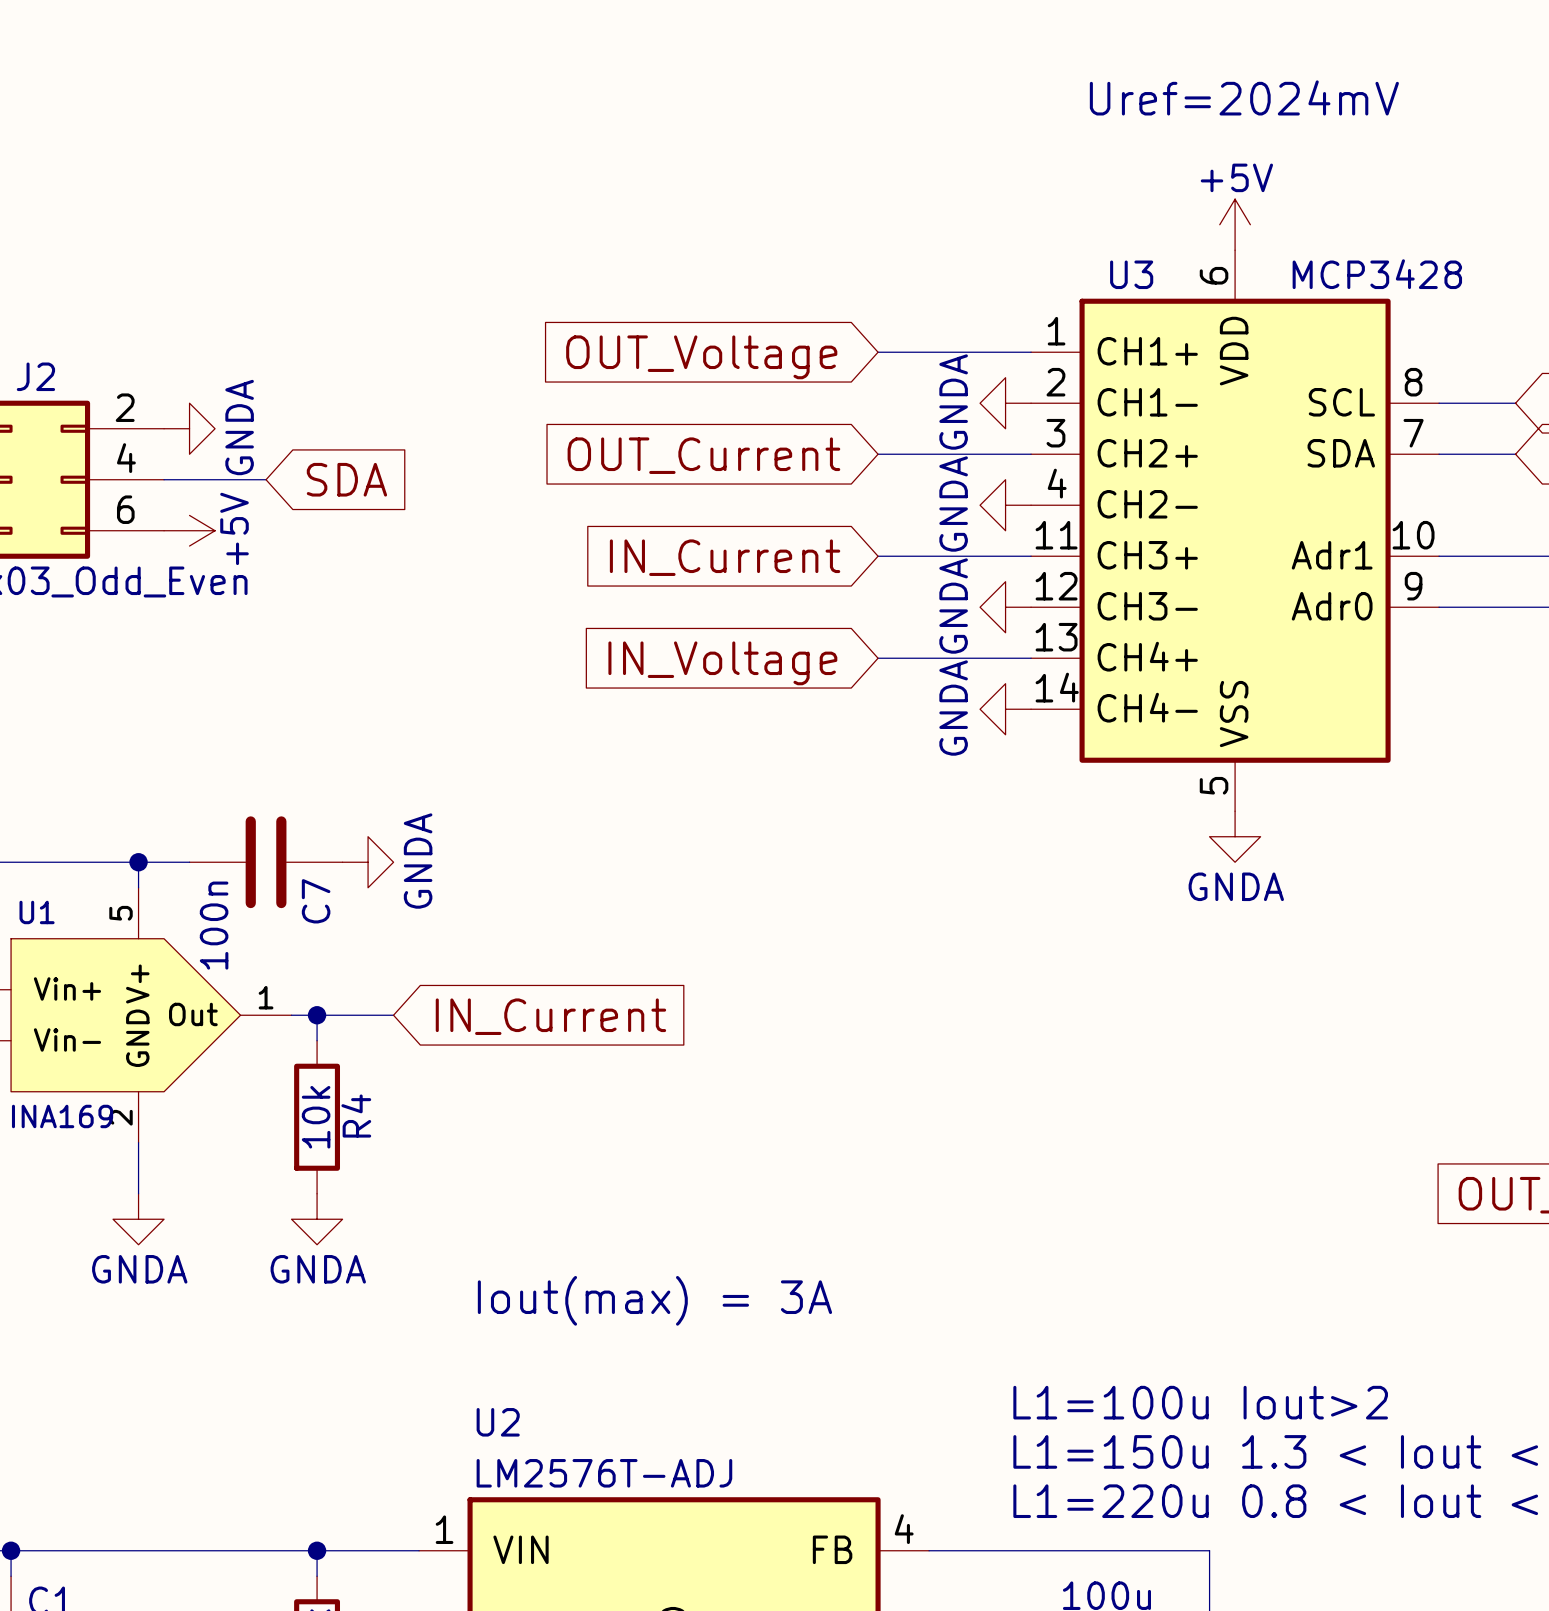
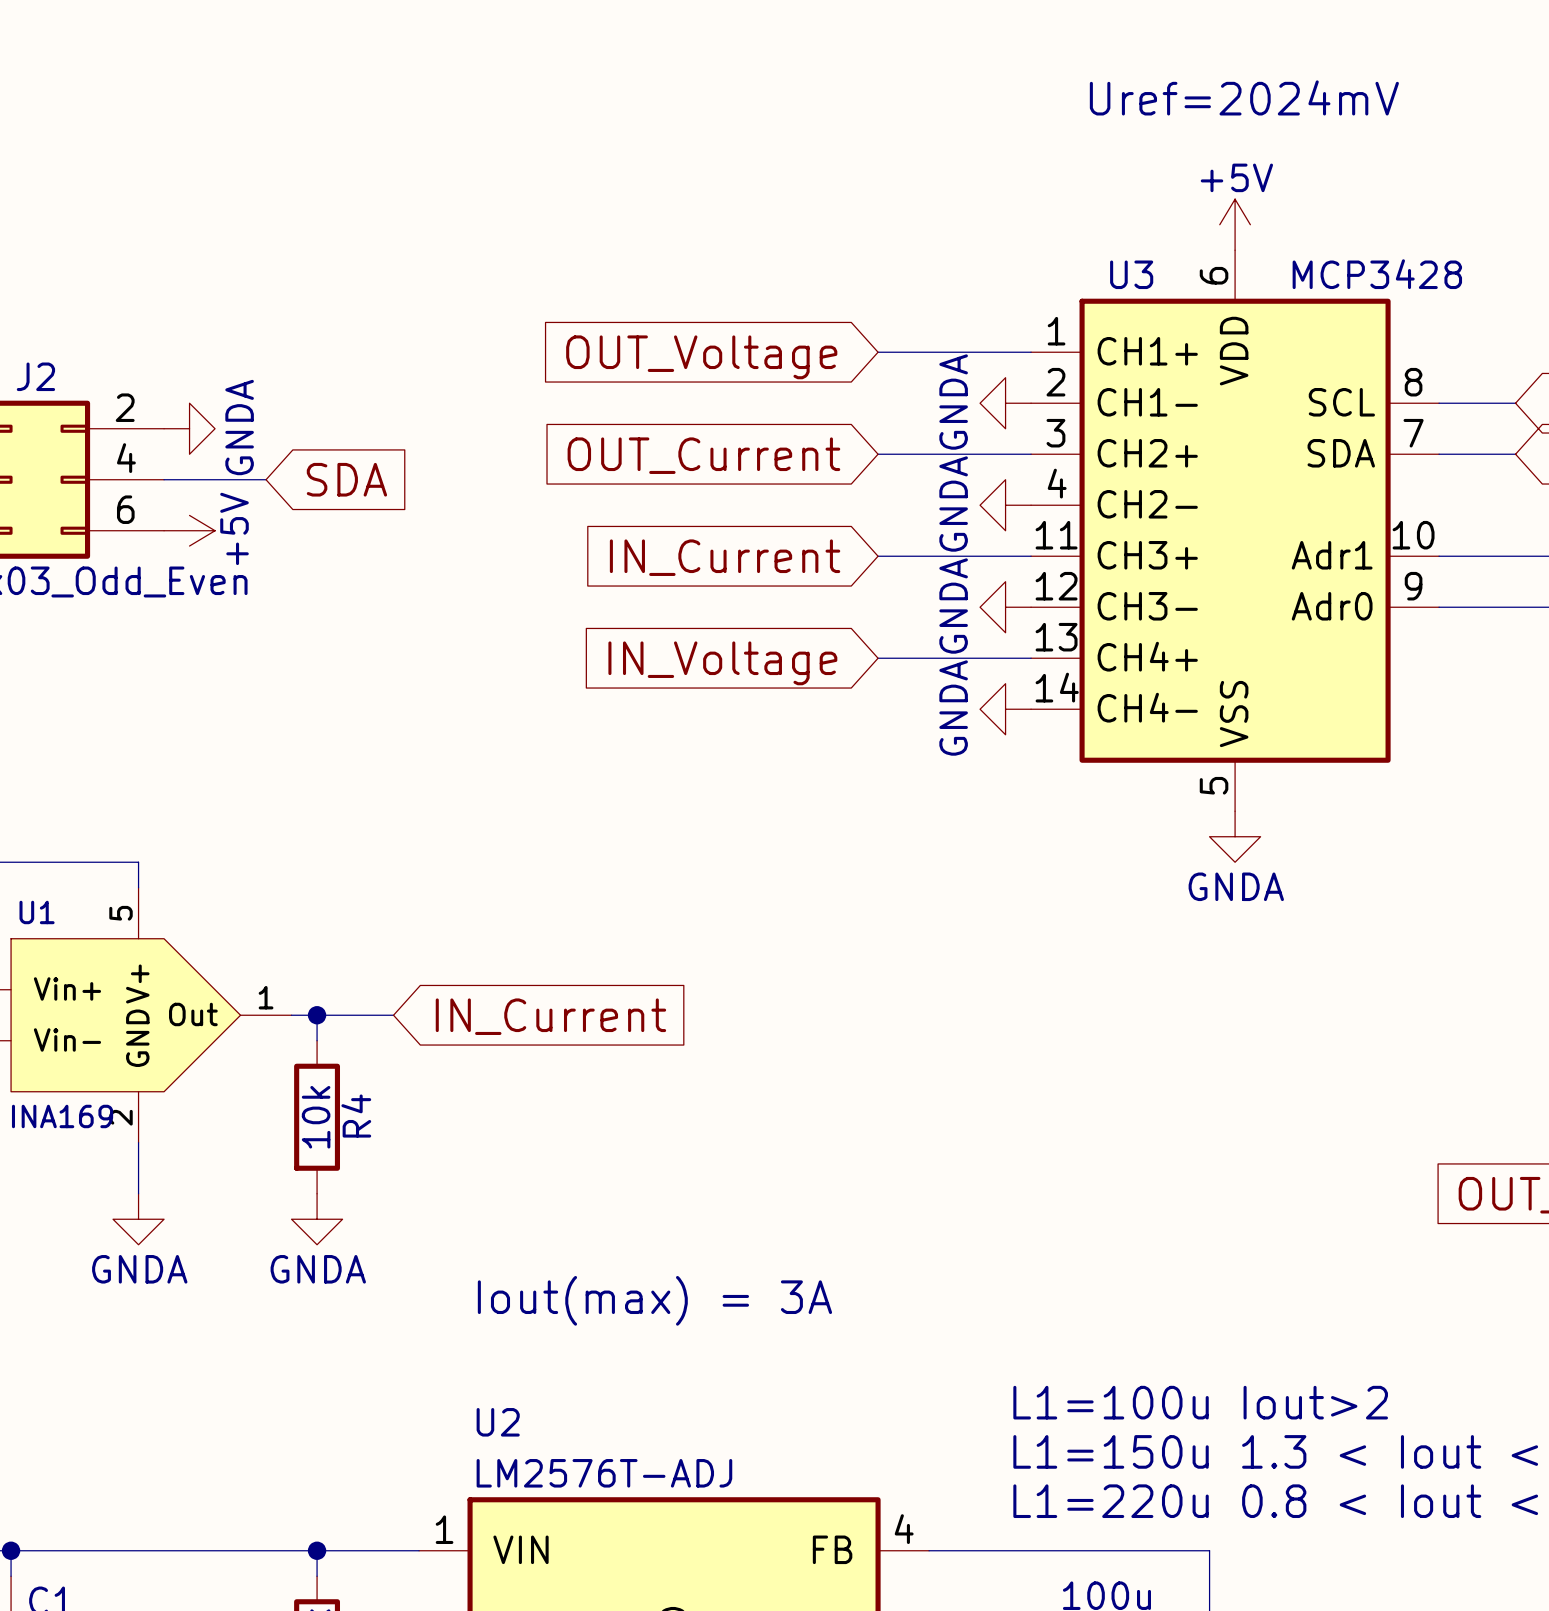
wire: (138, 862) (189, 862) -> none
junction: (138, 862) -> none
C7: 100n (266, 862) -> none
power symbol: GNDA (368, 862) -> none

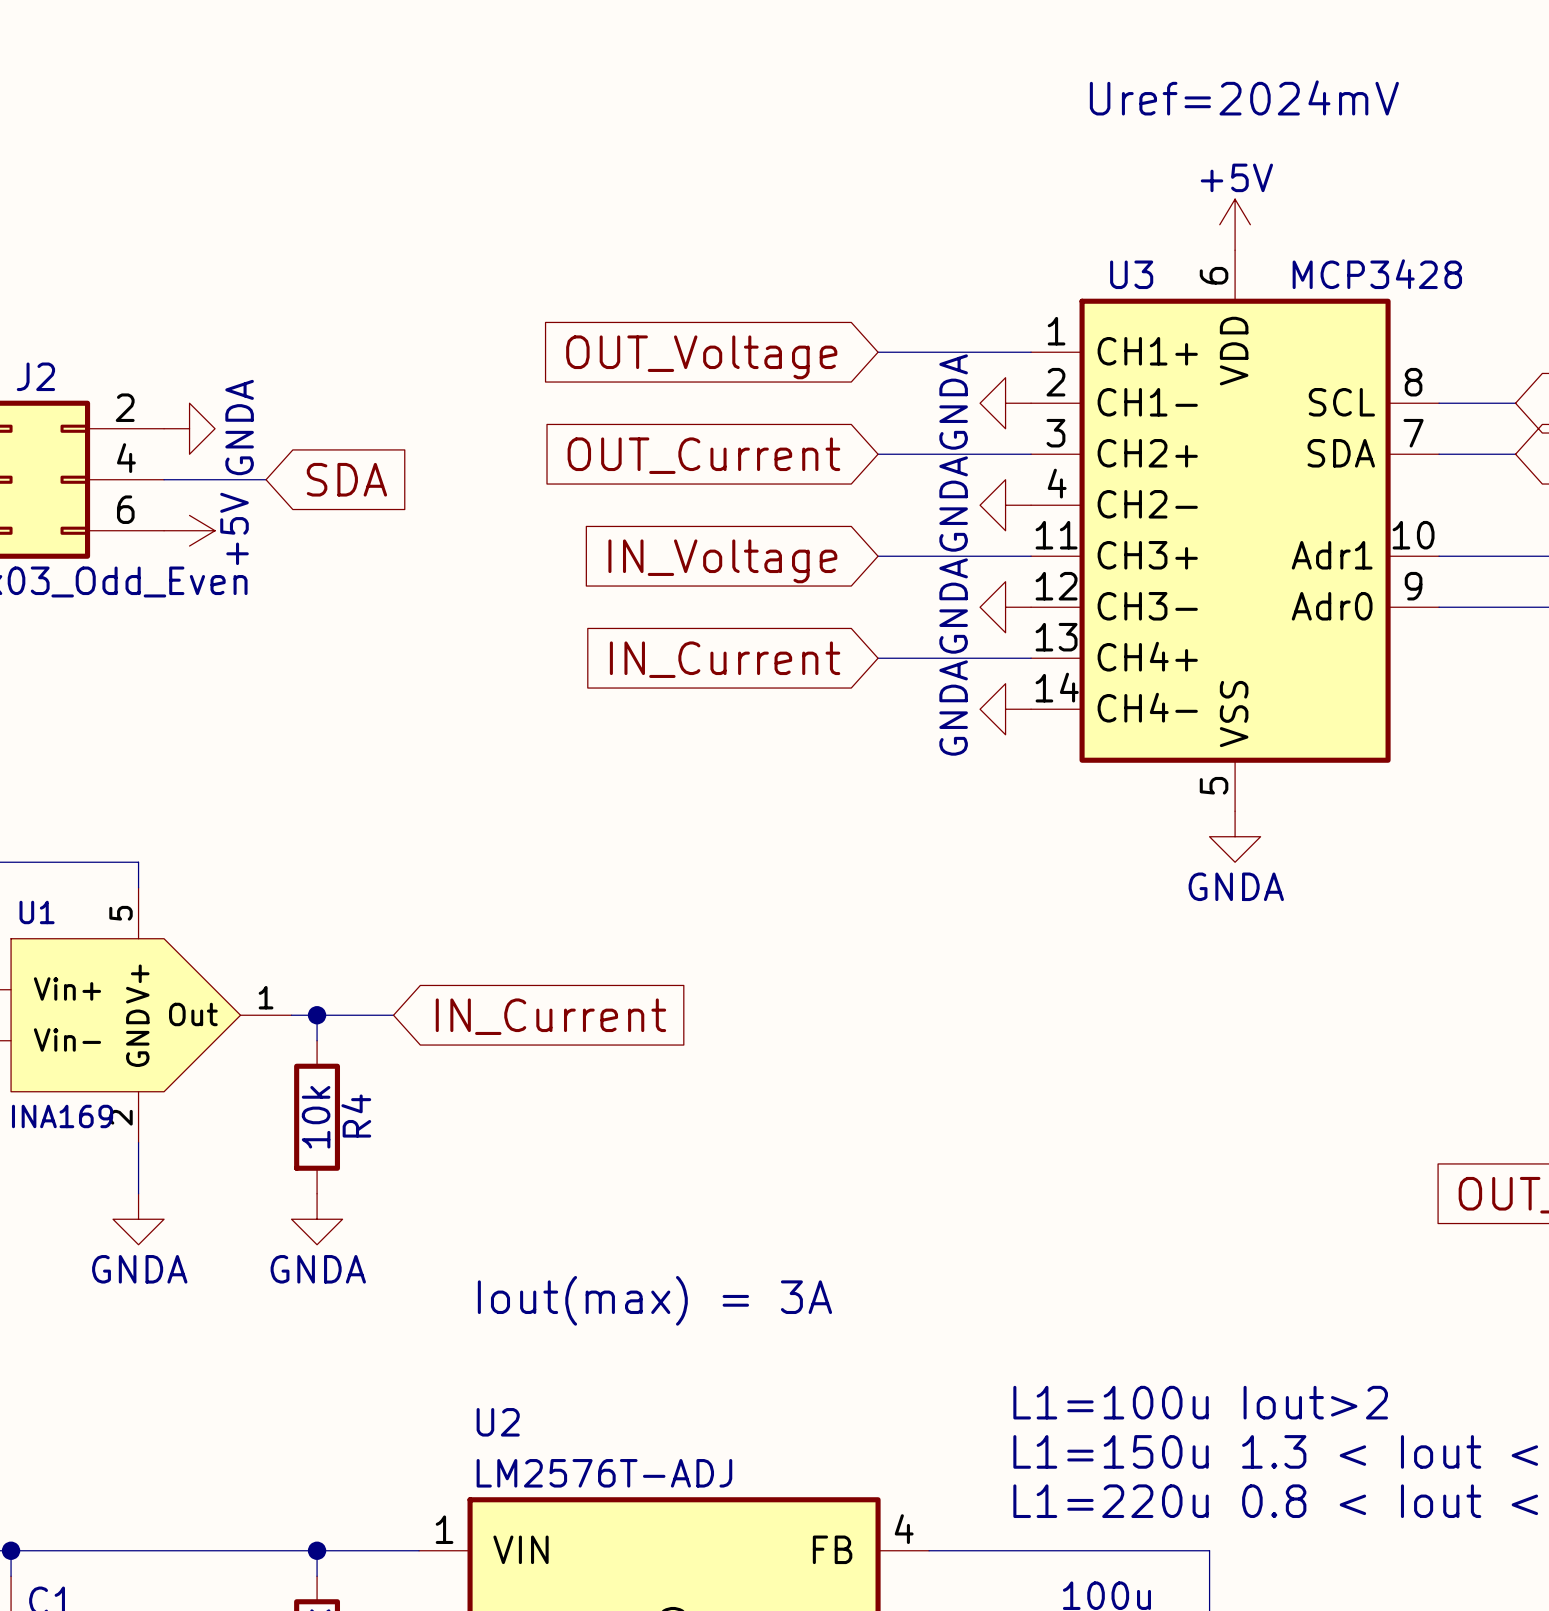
global label: IN_Current (725, 557) -> IN_Voltage (722, 561)
global label: IN_Voltage (722, 663) -> IN_Current (725, 659)

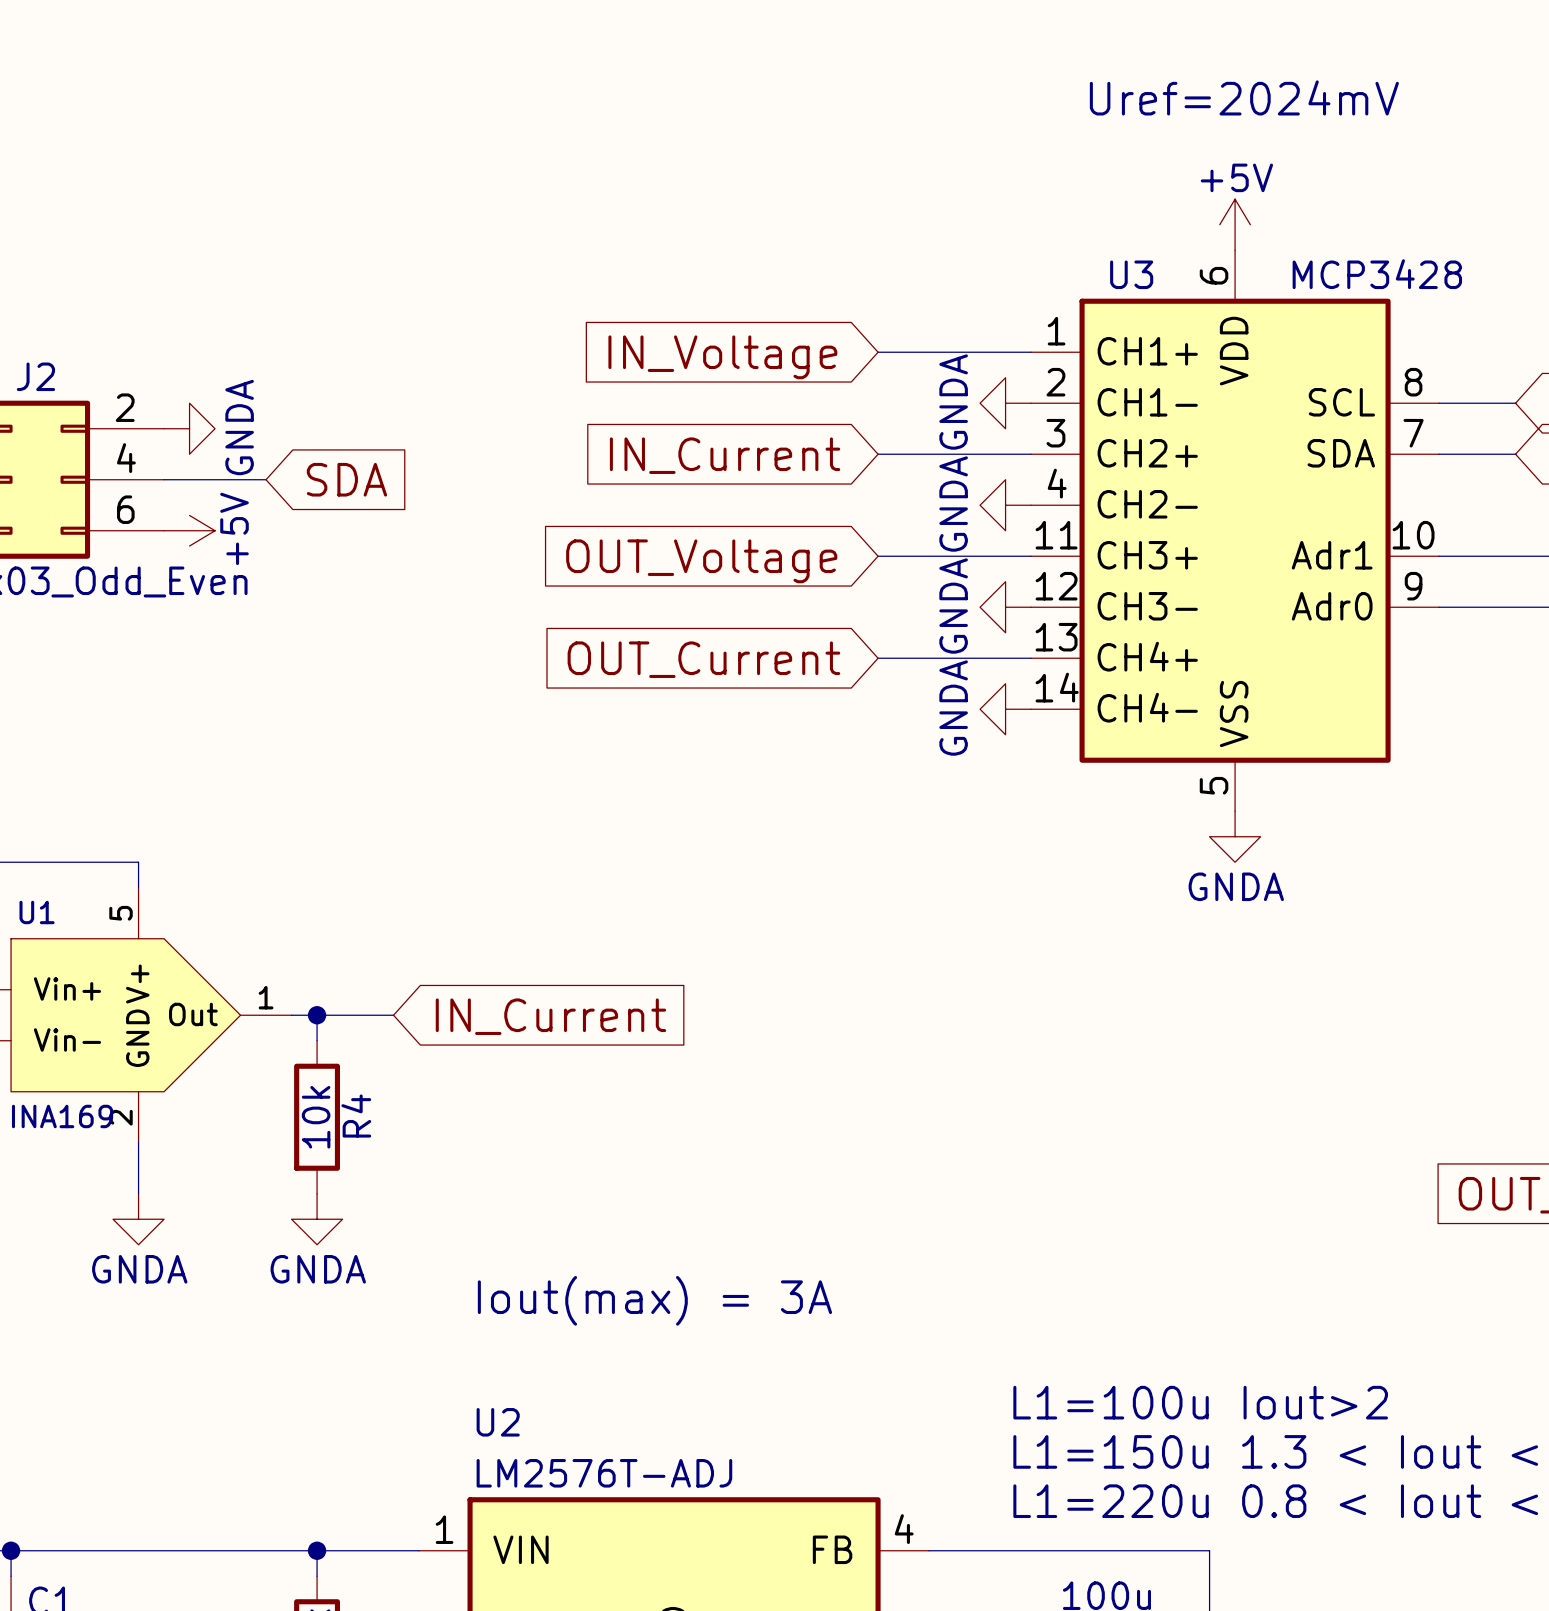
global label: OUT_Voltage (701, 357) -> IN_Voltage (722, 357)
global label: OUT_Current (703, 455) -> IN_Current (725, 455)
global label: IN_Voltage (722, 561) -> OUT_Voltage (701, 561)
global label: IN_Current (725, 659) -> OUT_Current (703, 659)

